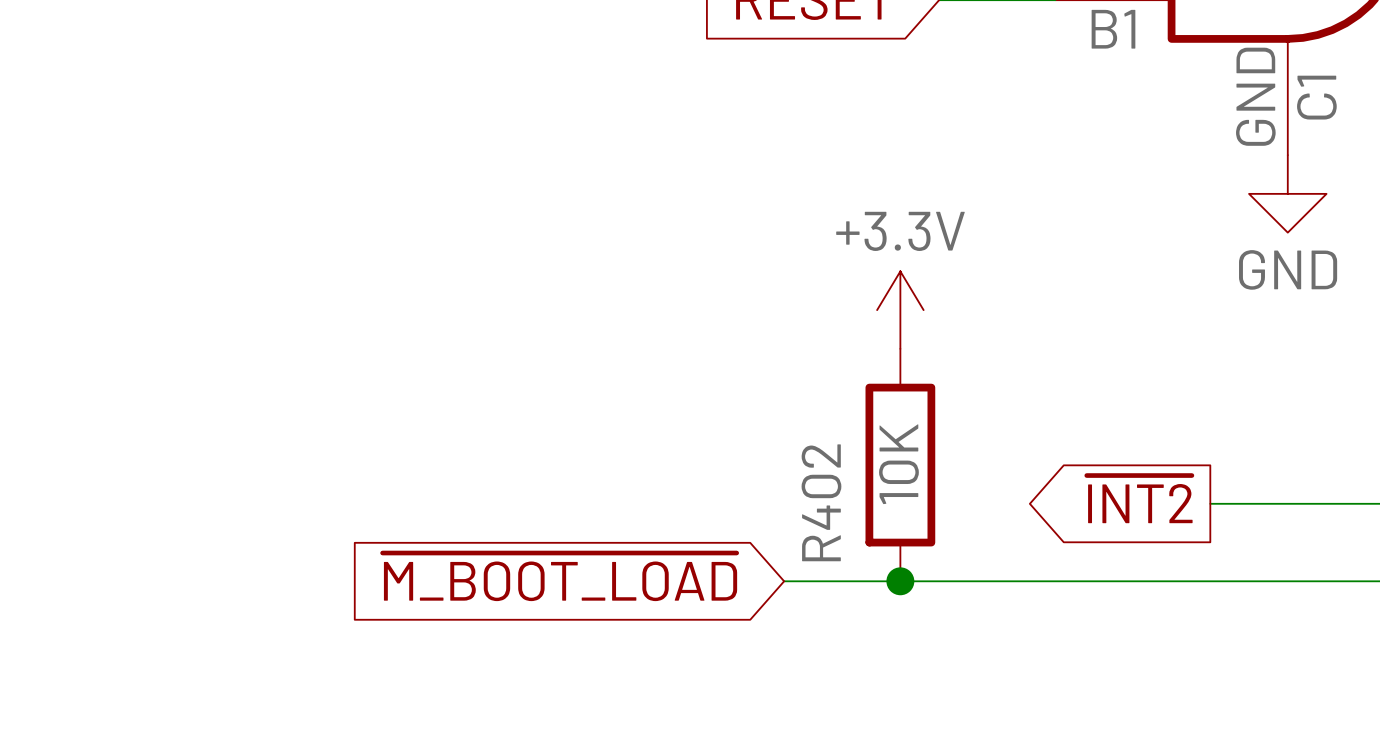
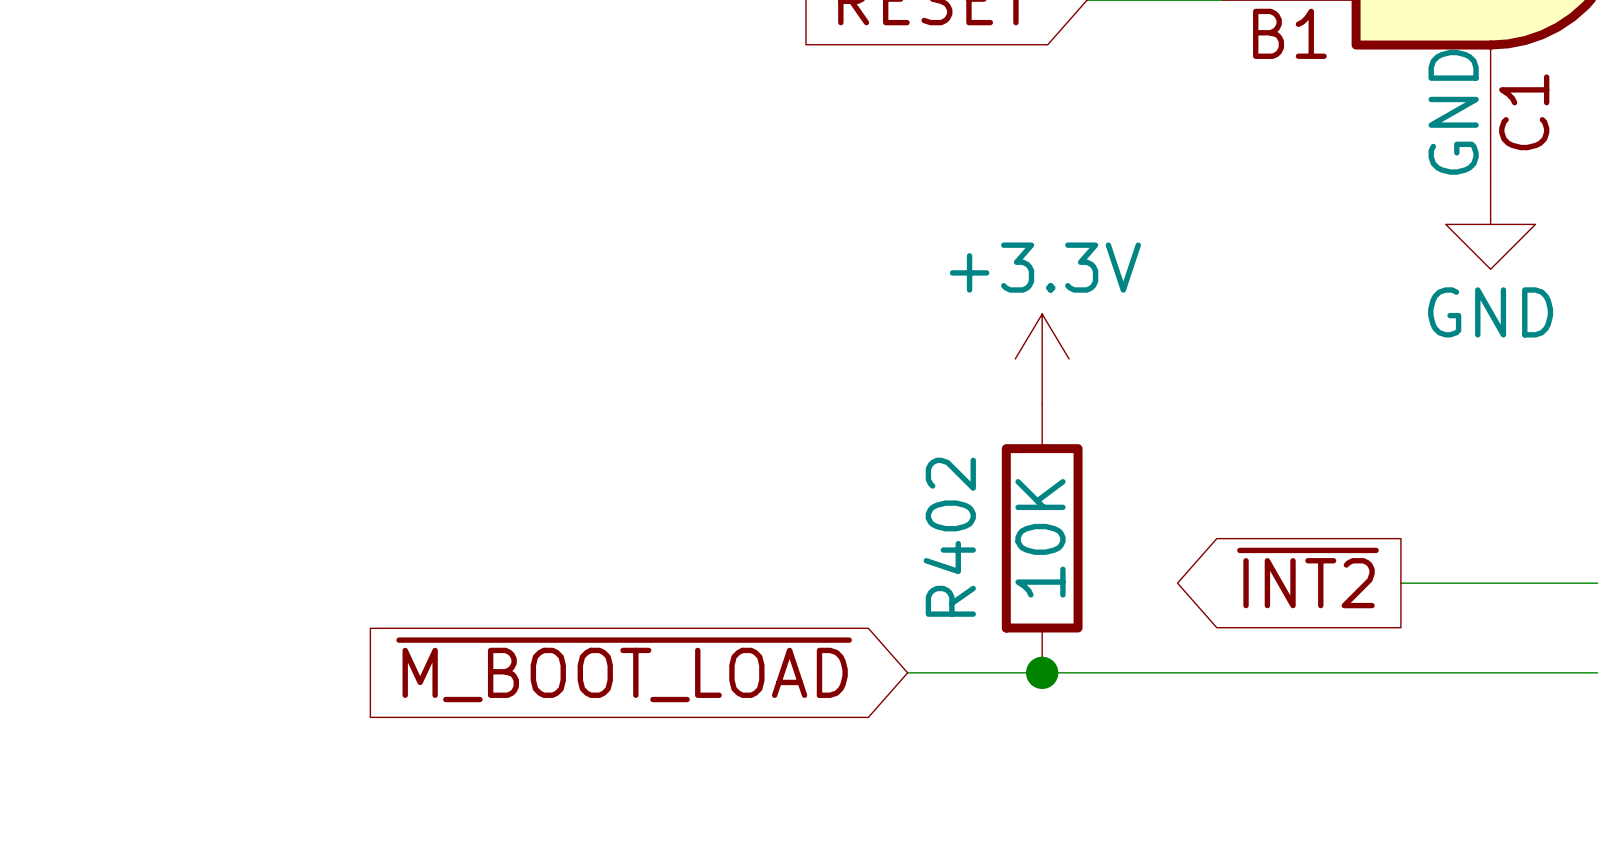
R402 name position: R402 (821, 502) -> R402 (949, 537)

